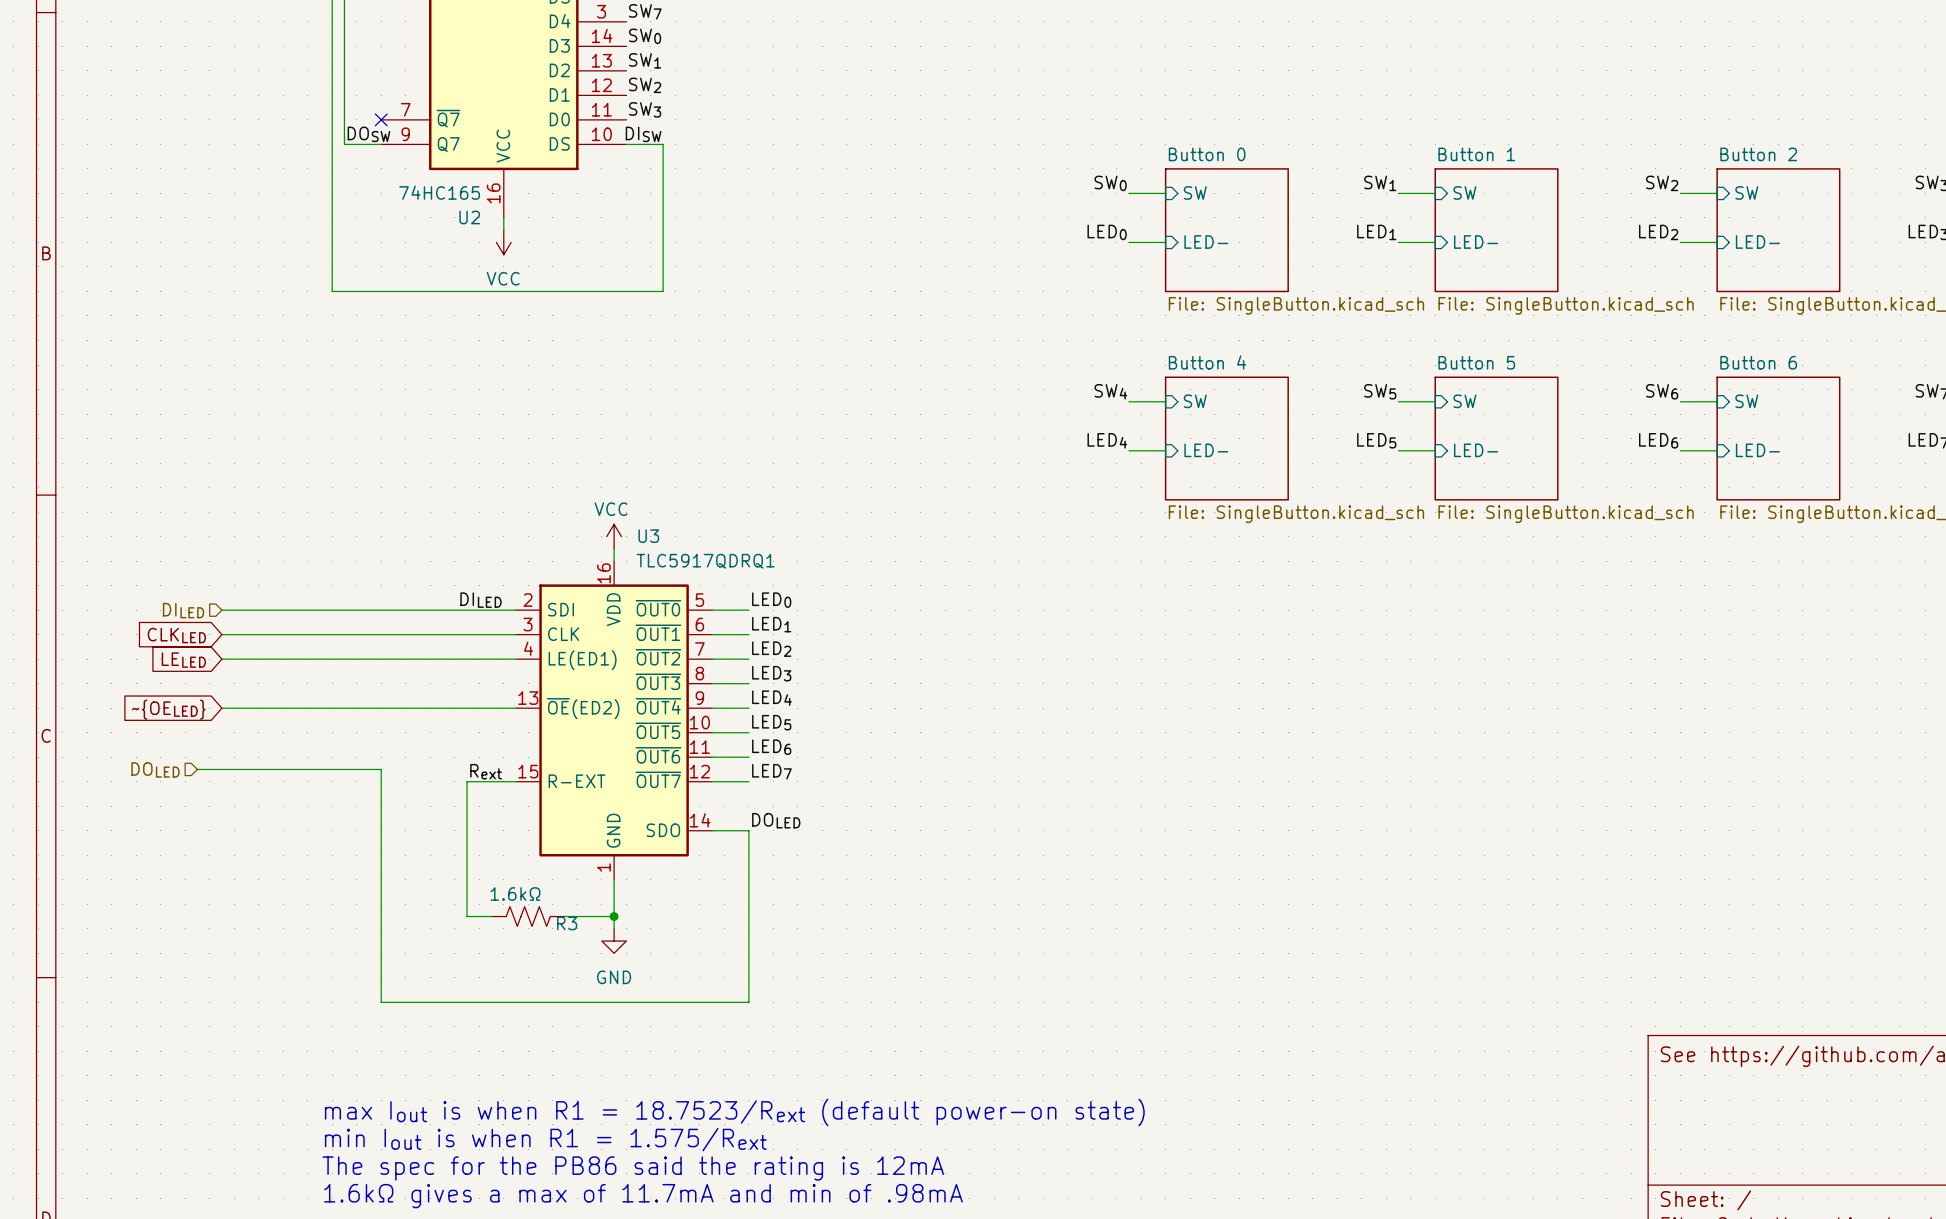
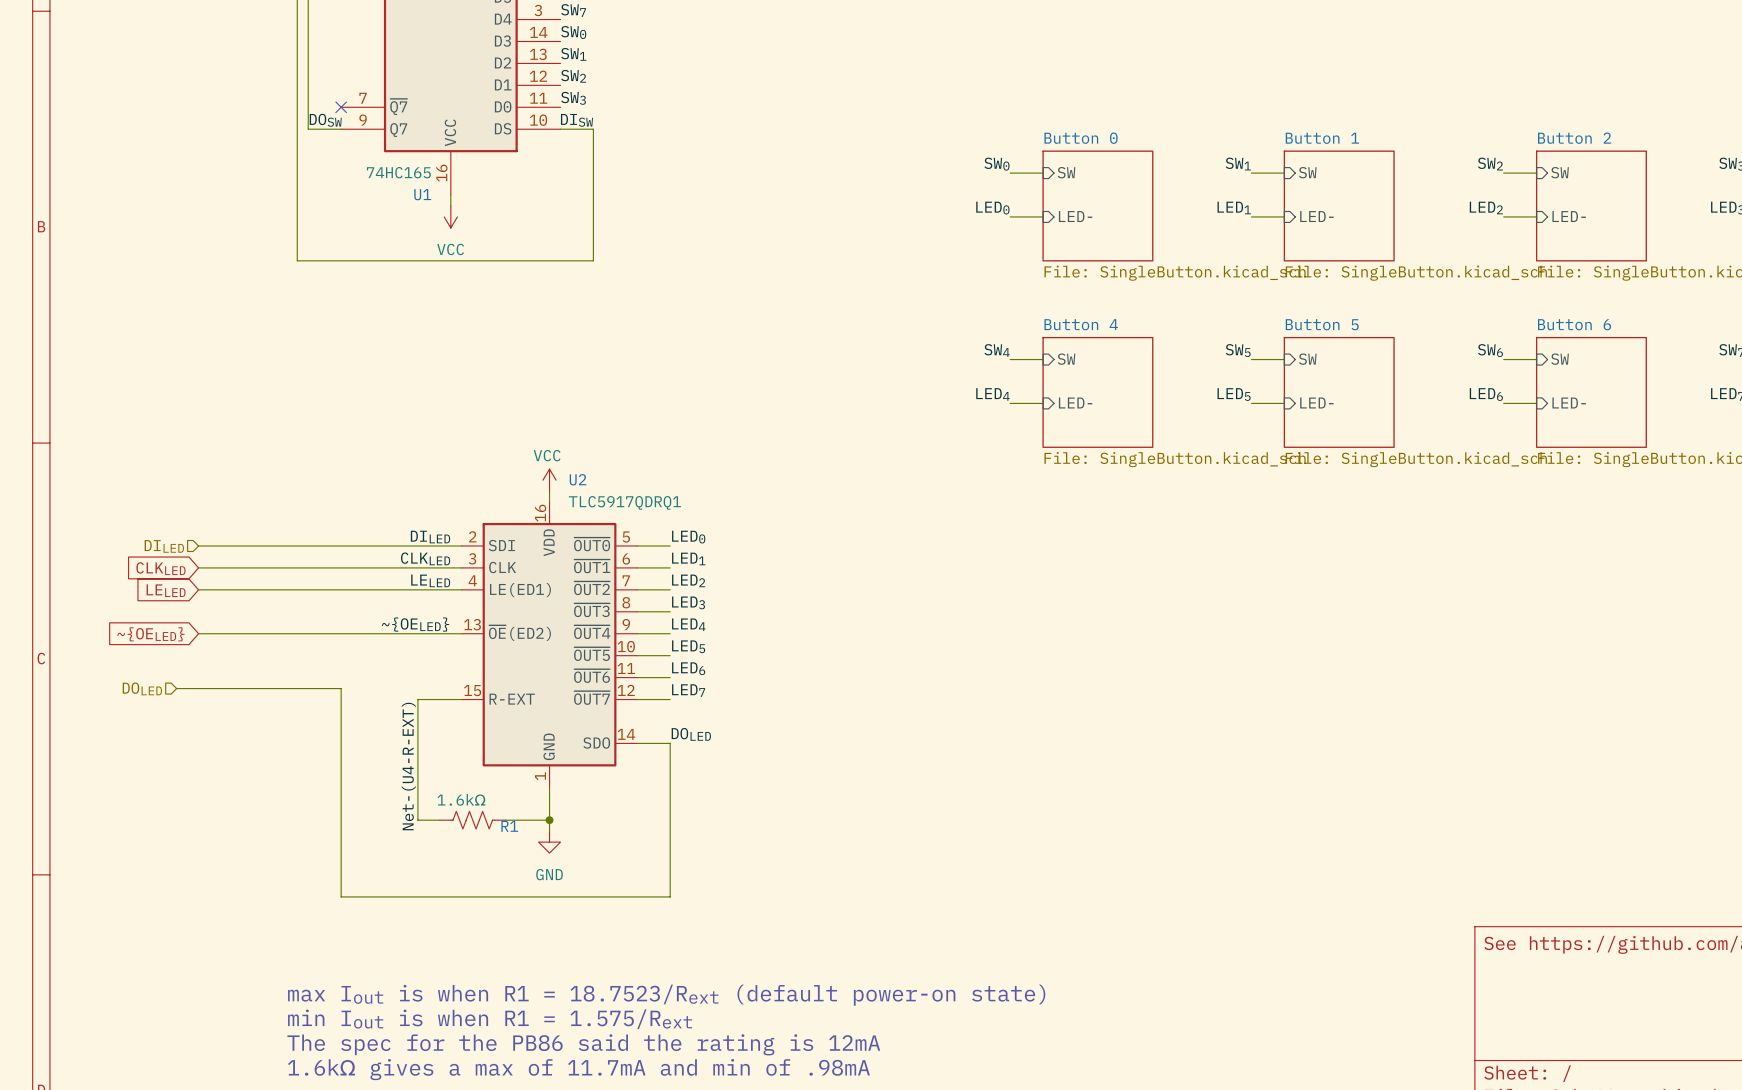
U2 name: U2 (469, 217) -> U1 (422, 194)
U3 name: U3 (648, 536) -> U2 (578, 479)
label: none -> CLKLED (425, 558)
label: none -> LELED (430, 580)
label: none -> ~{OELED} (415, 624)
label: Rext (486, 771) -> Net-(U4-R-EXT) (408, 766)
R3 name: R3 (567, 923) -> R1 (509, 826)

